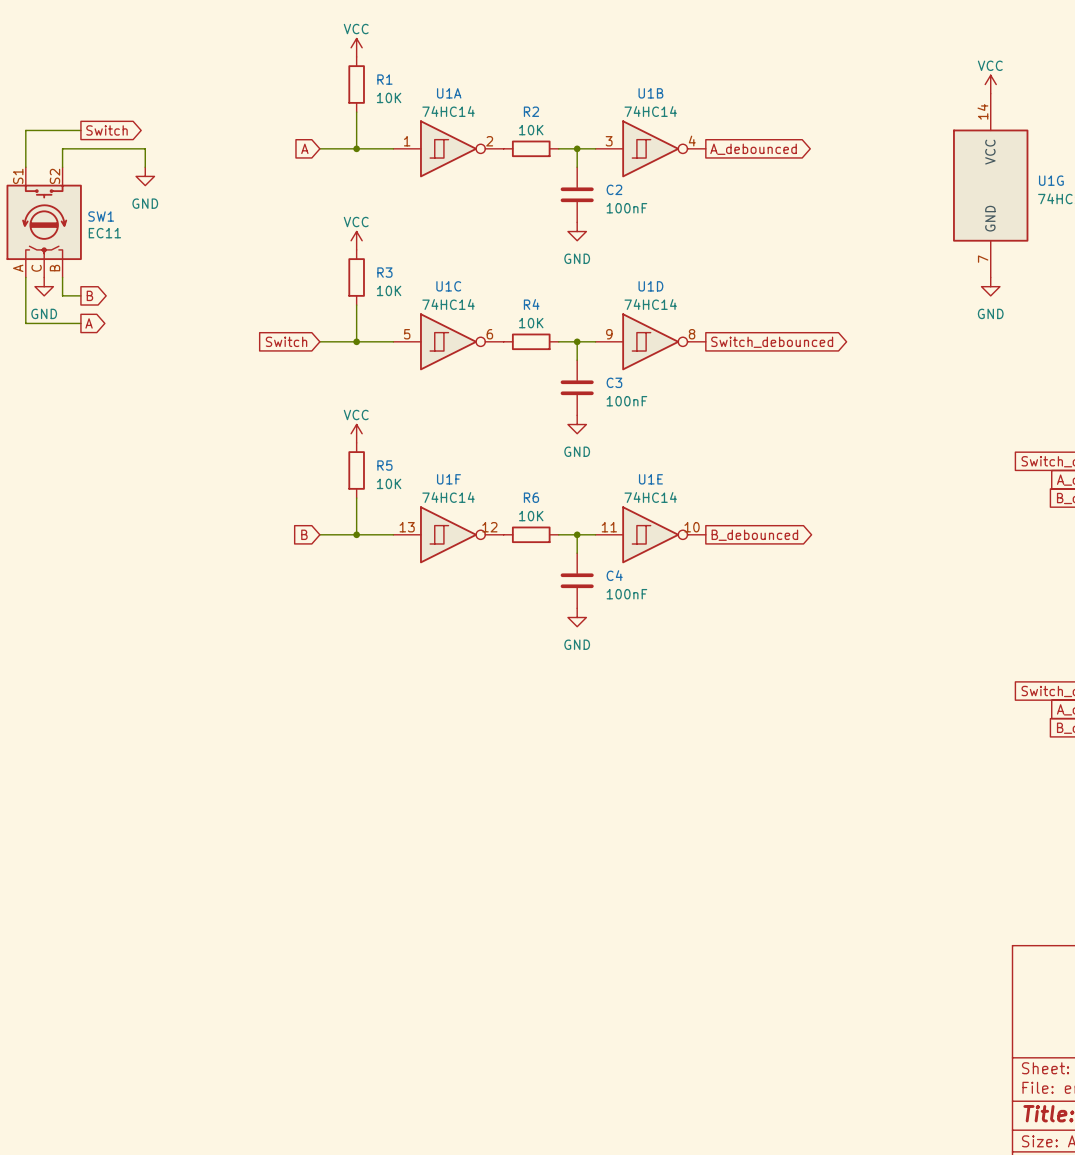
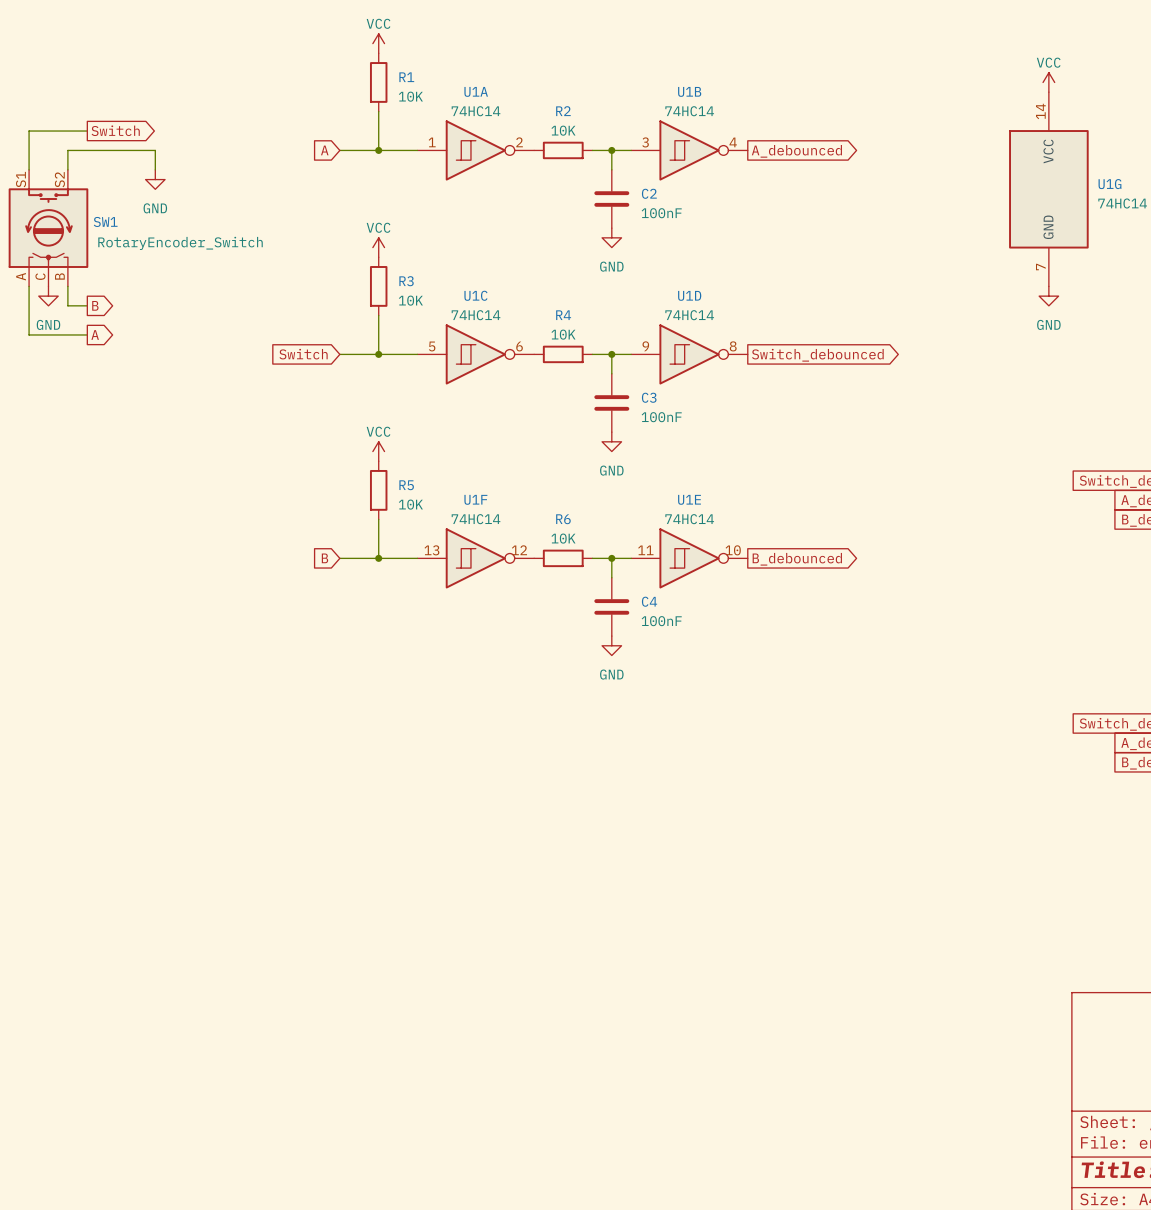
SW1 value: EC11 (104, 233) -> RotaryEncoder_Switch (180, 243)

